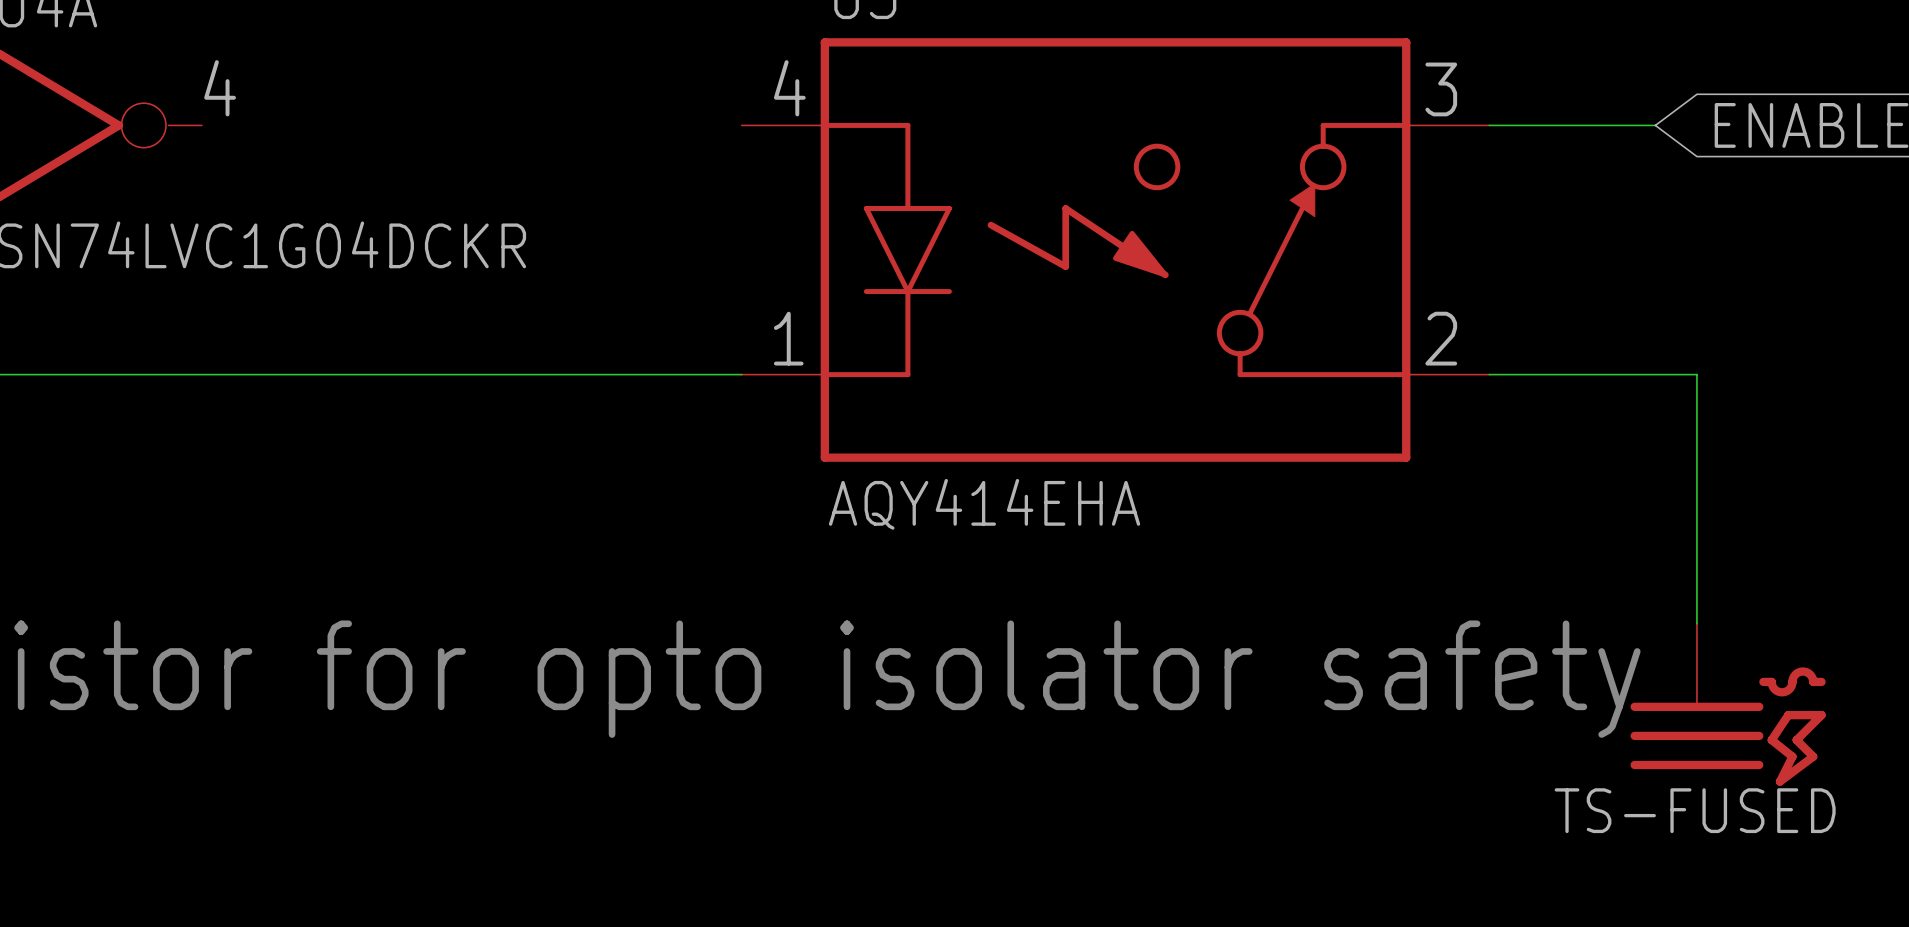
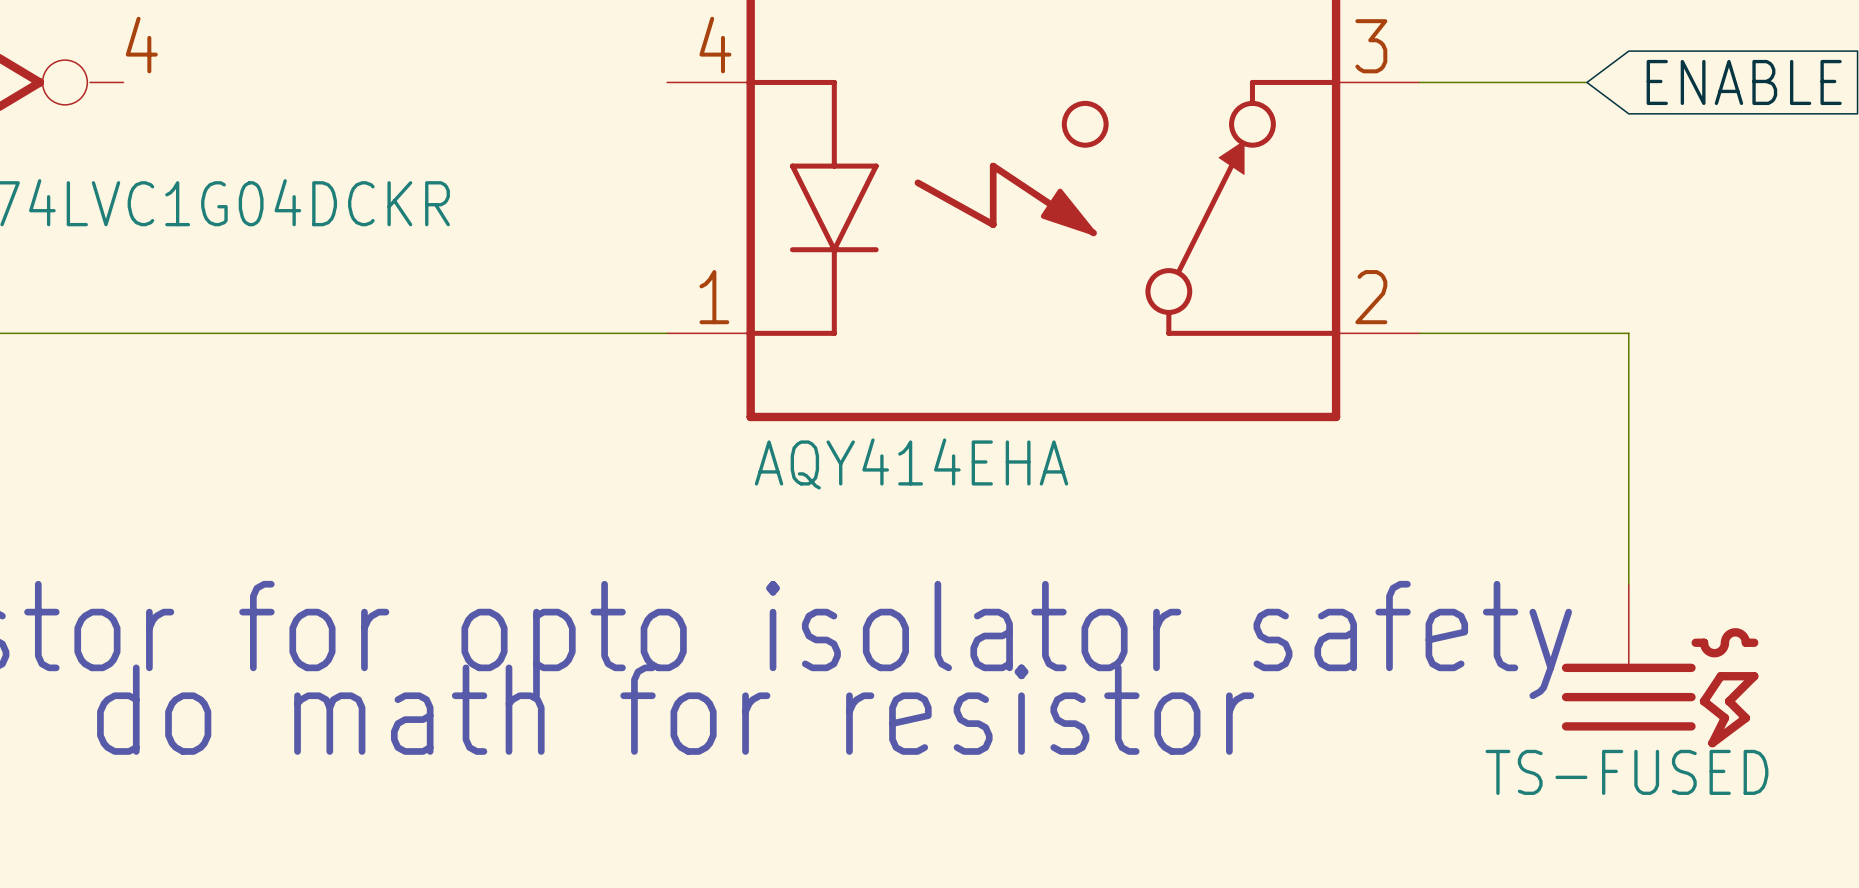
text: none -> do math for resistor (675, 709)

